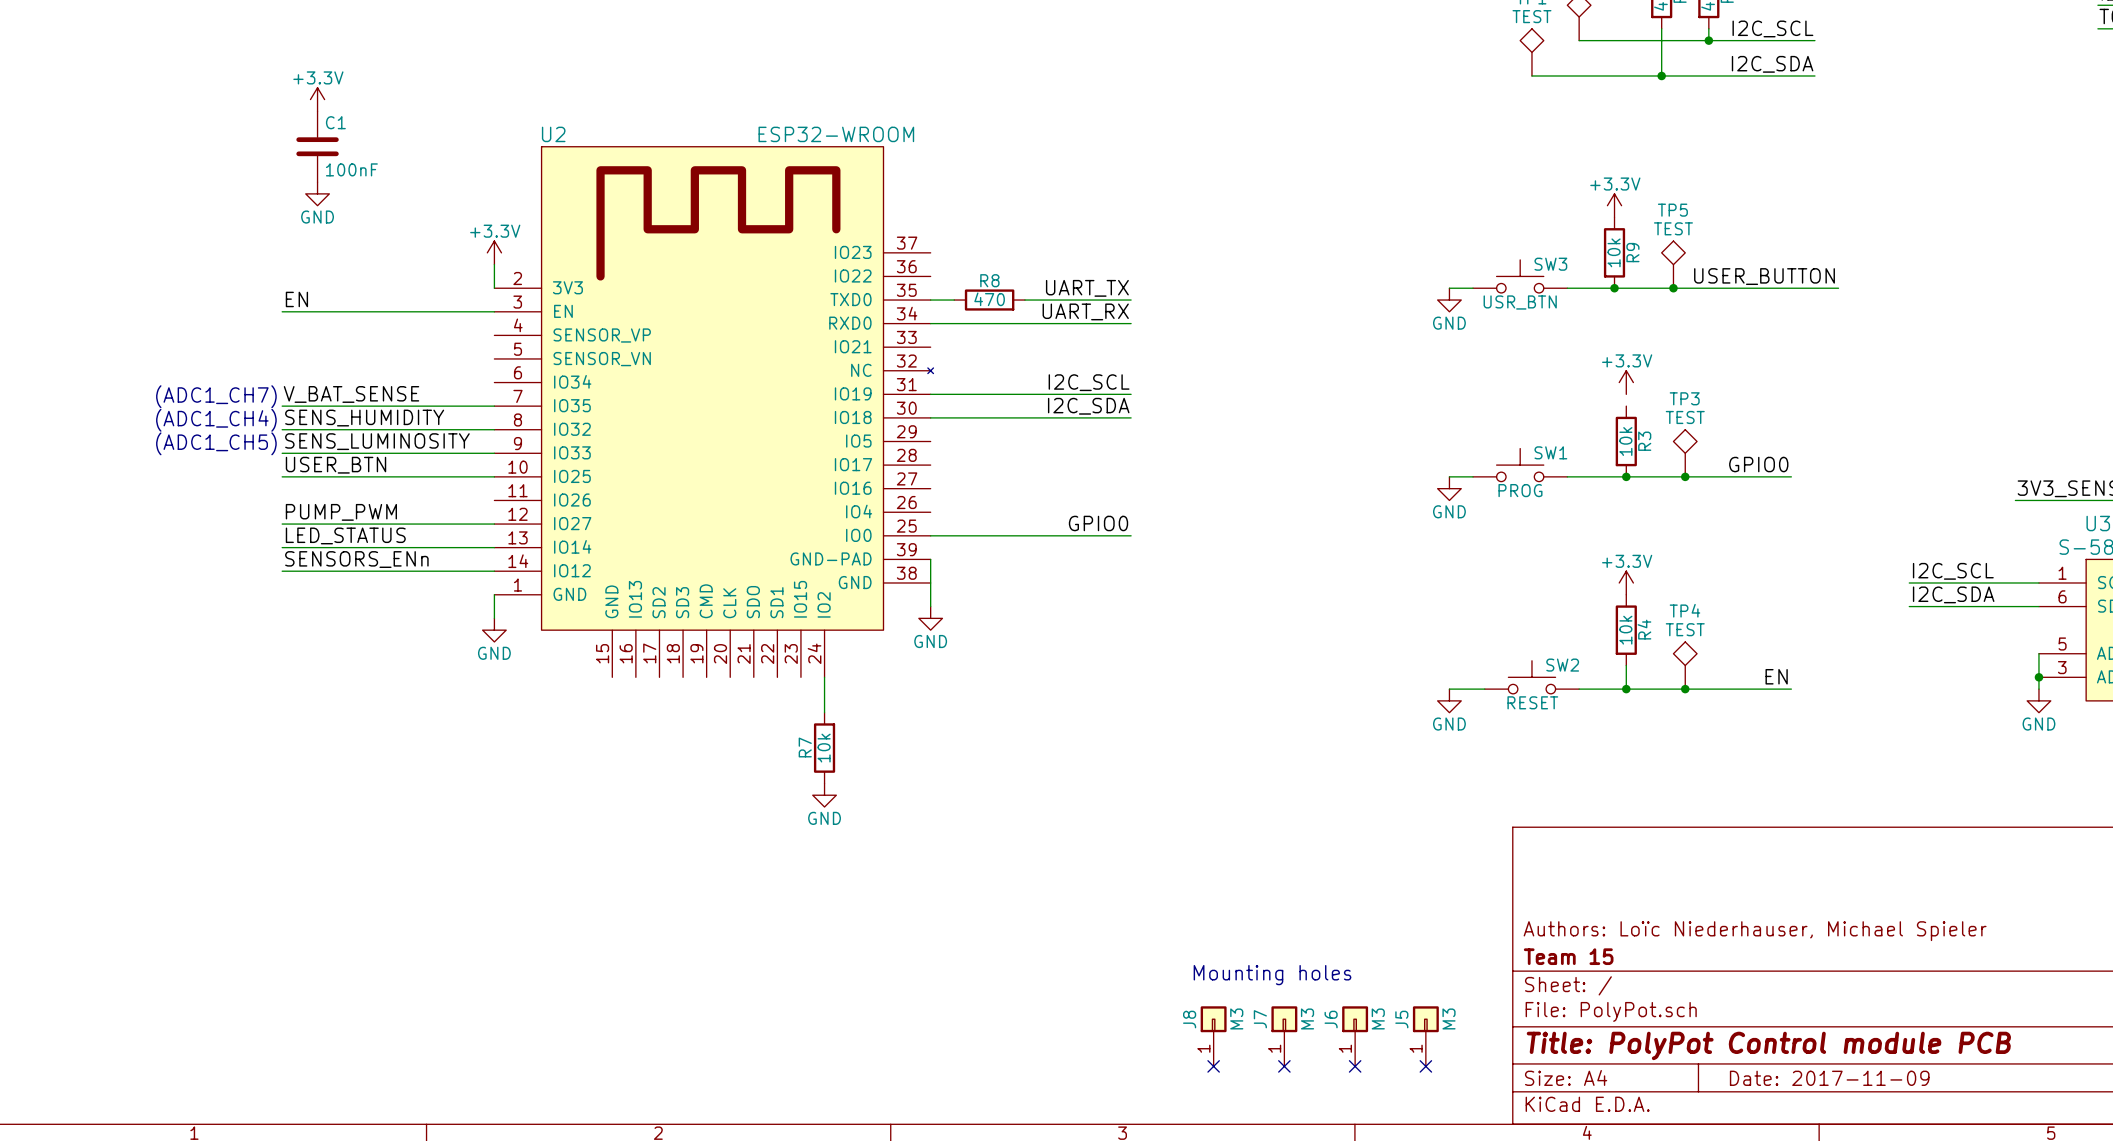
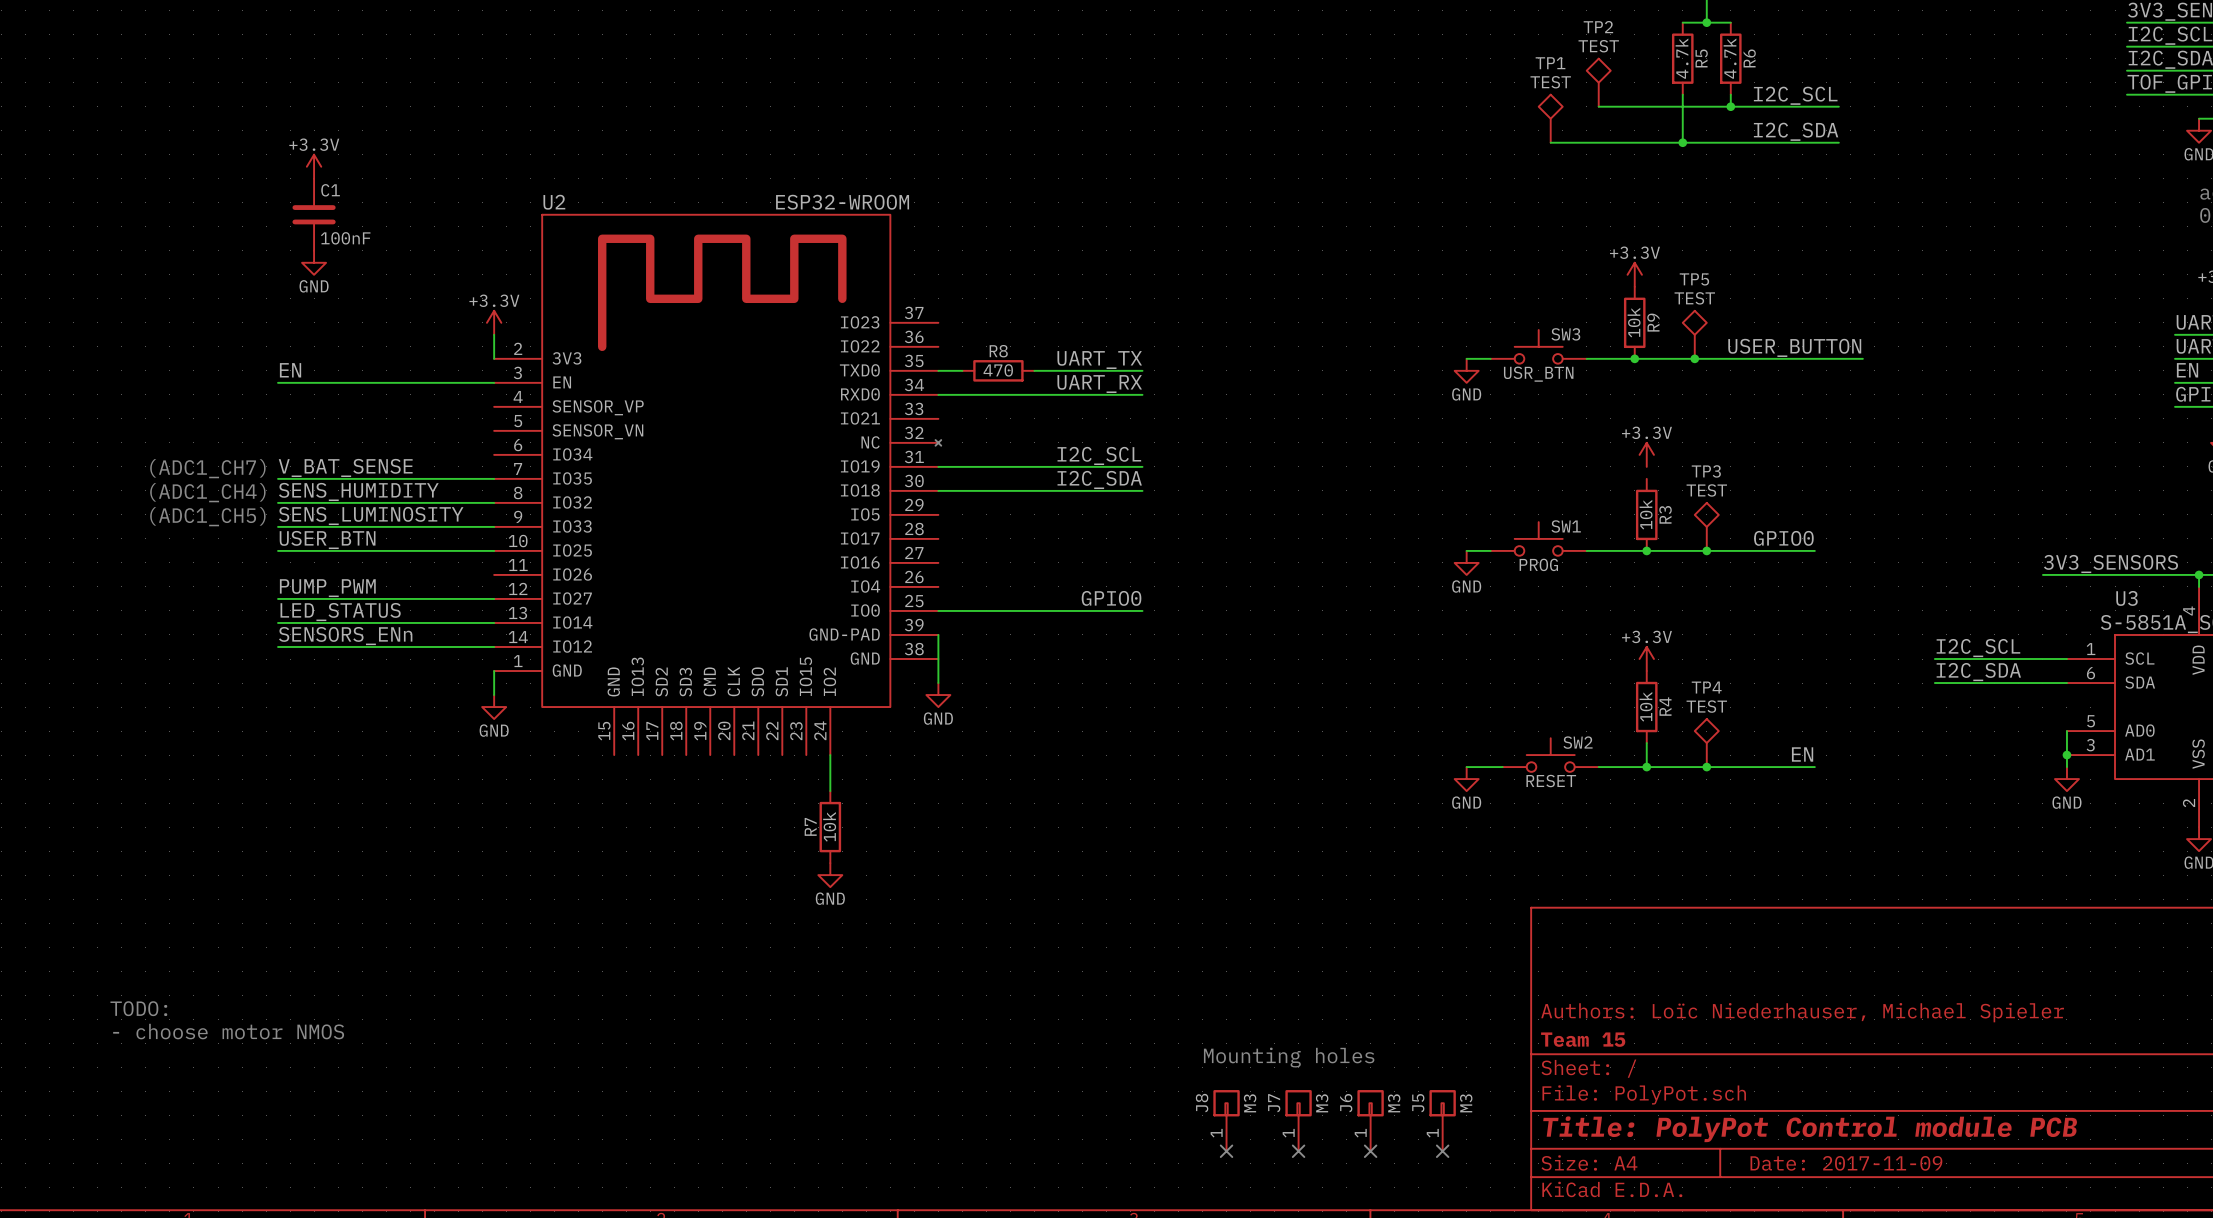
text: none -> TODO: (138, 1008)
text: none -> - choose motor NMOS (228, 1031)

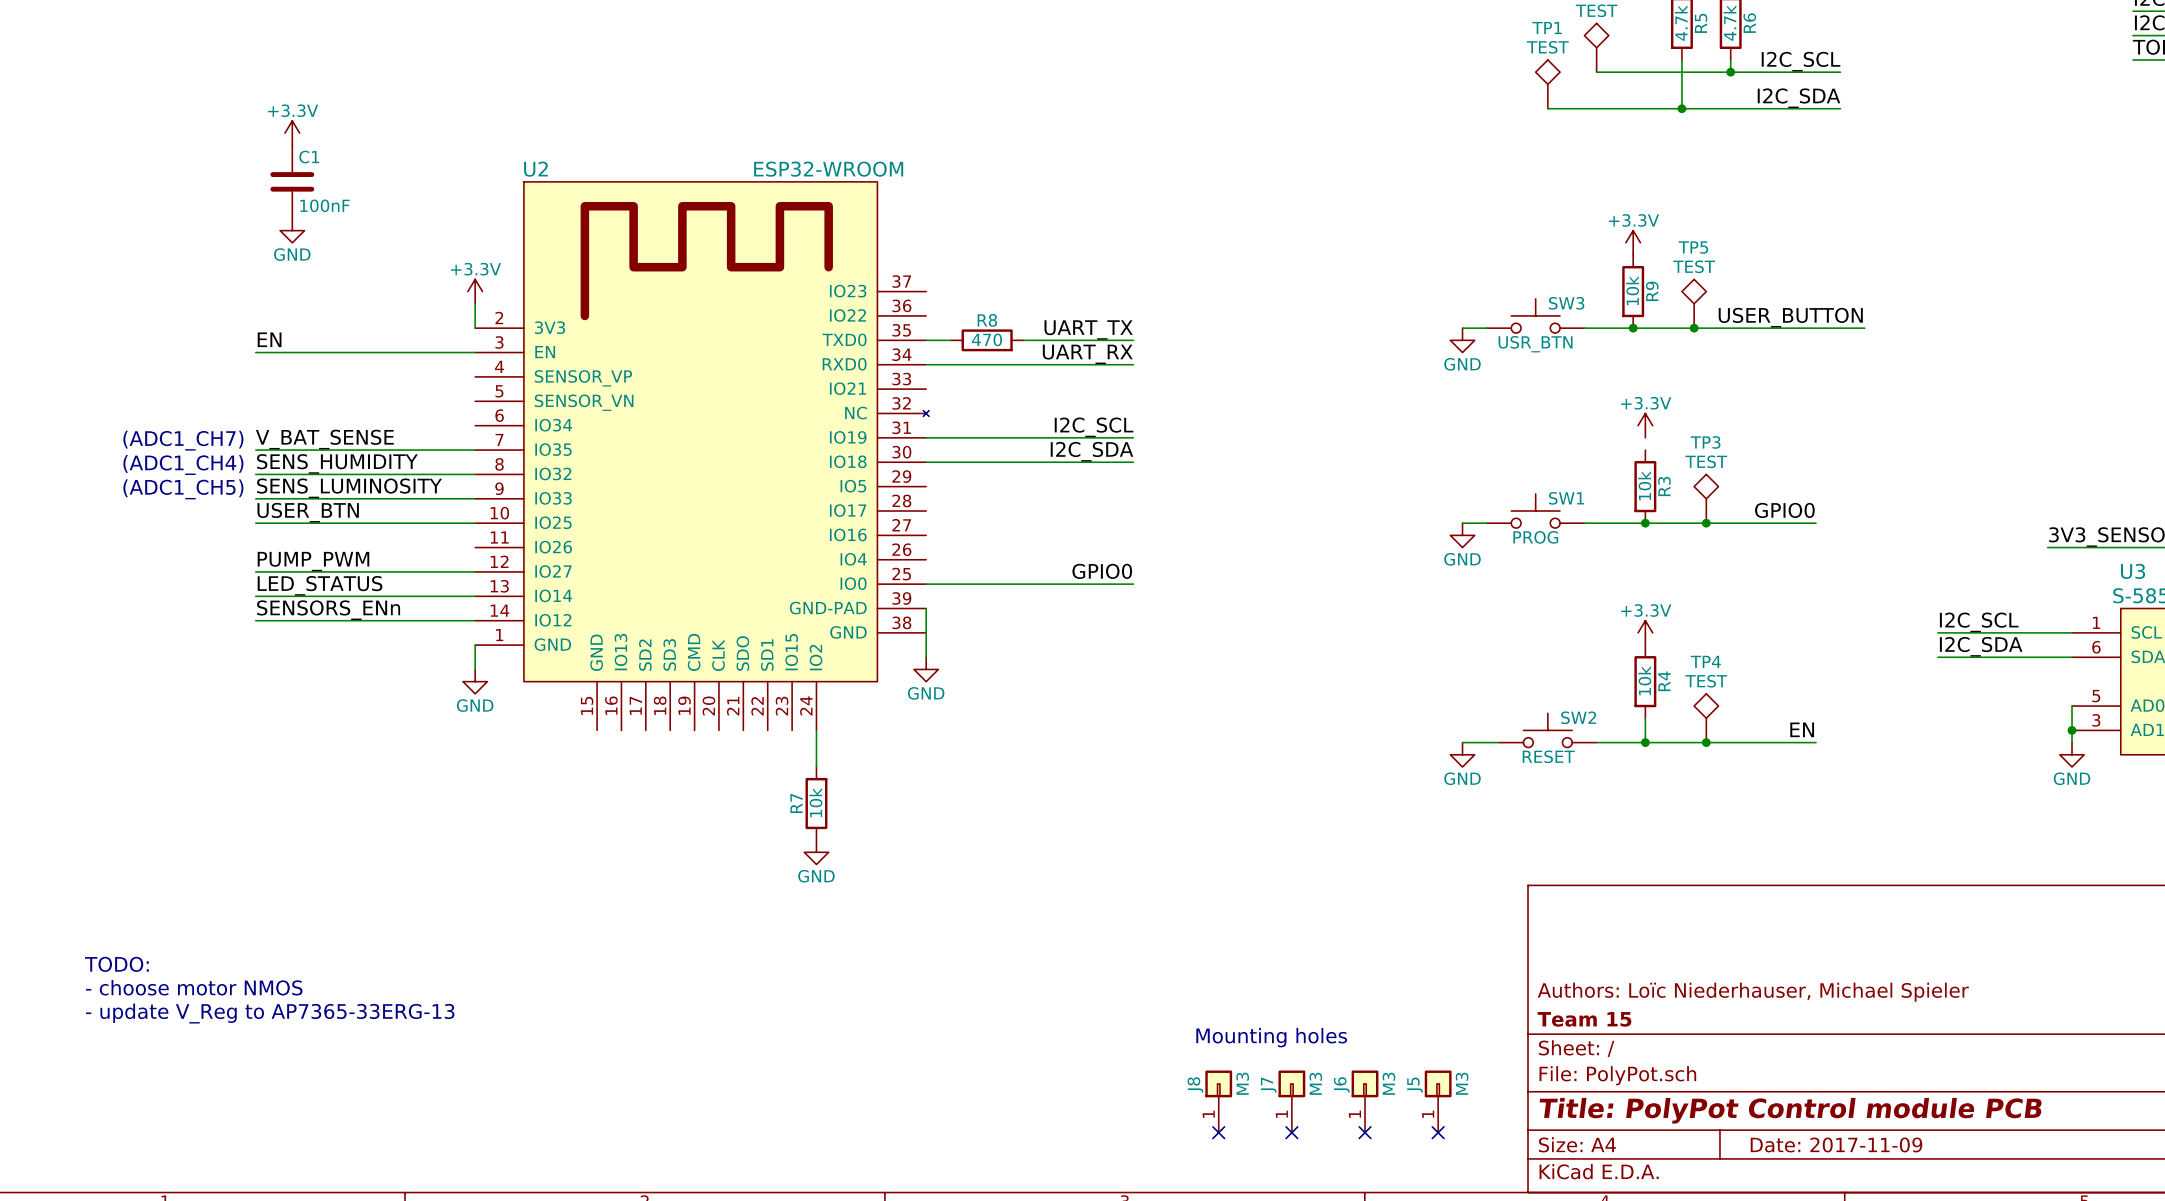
text: none -> TODO: (116, 964)
text: TODO: (138, 1008) -> - choose motor NMOS (194, 987)
text: - choose motor NMOS (228, 1031) -> - update V_Reg to AP7365-33ERG-13 (270, 1013)

